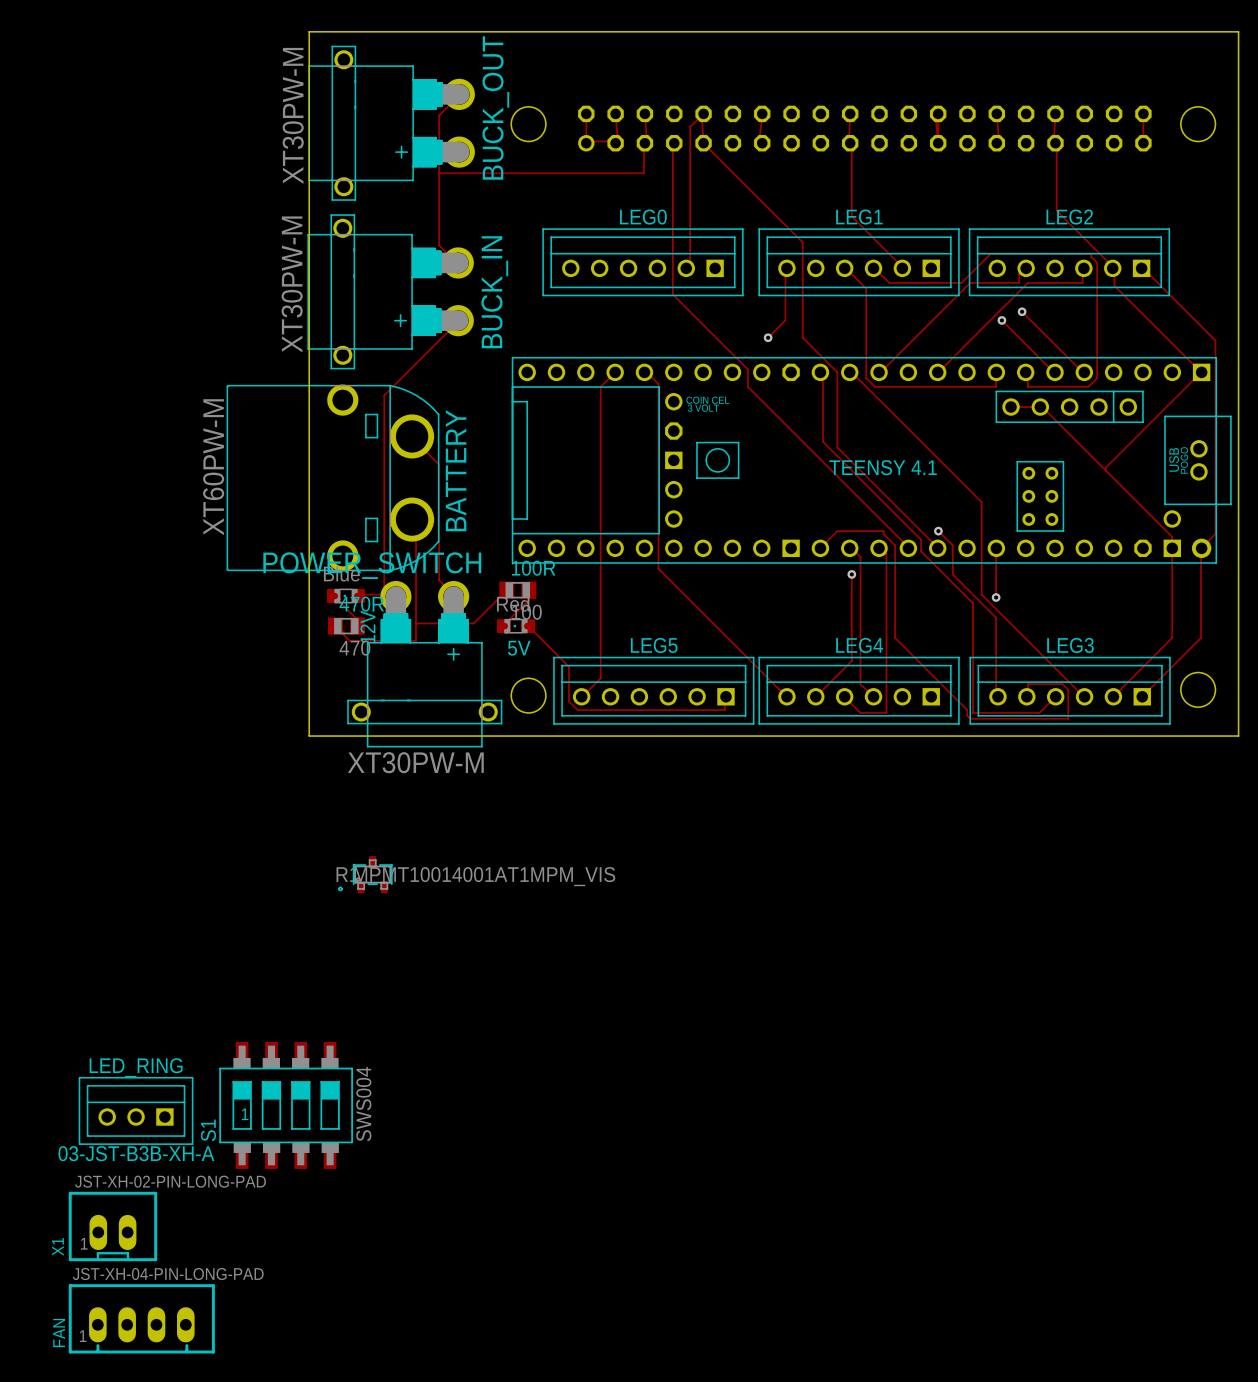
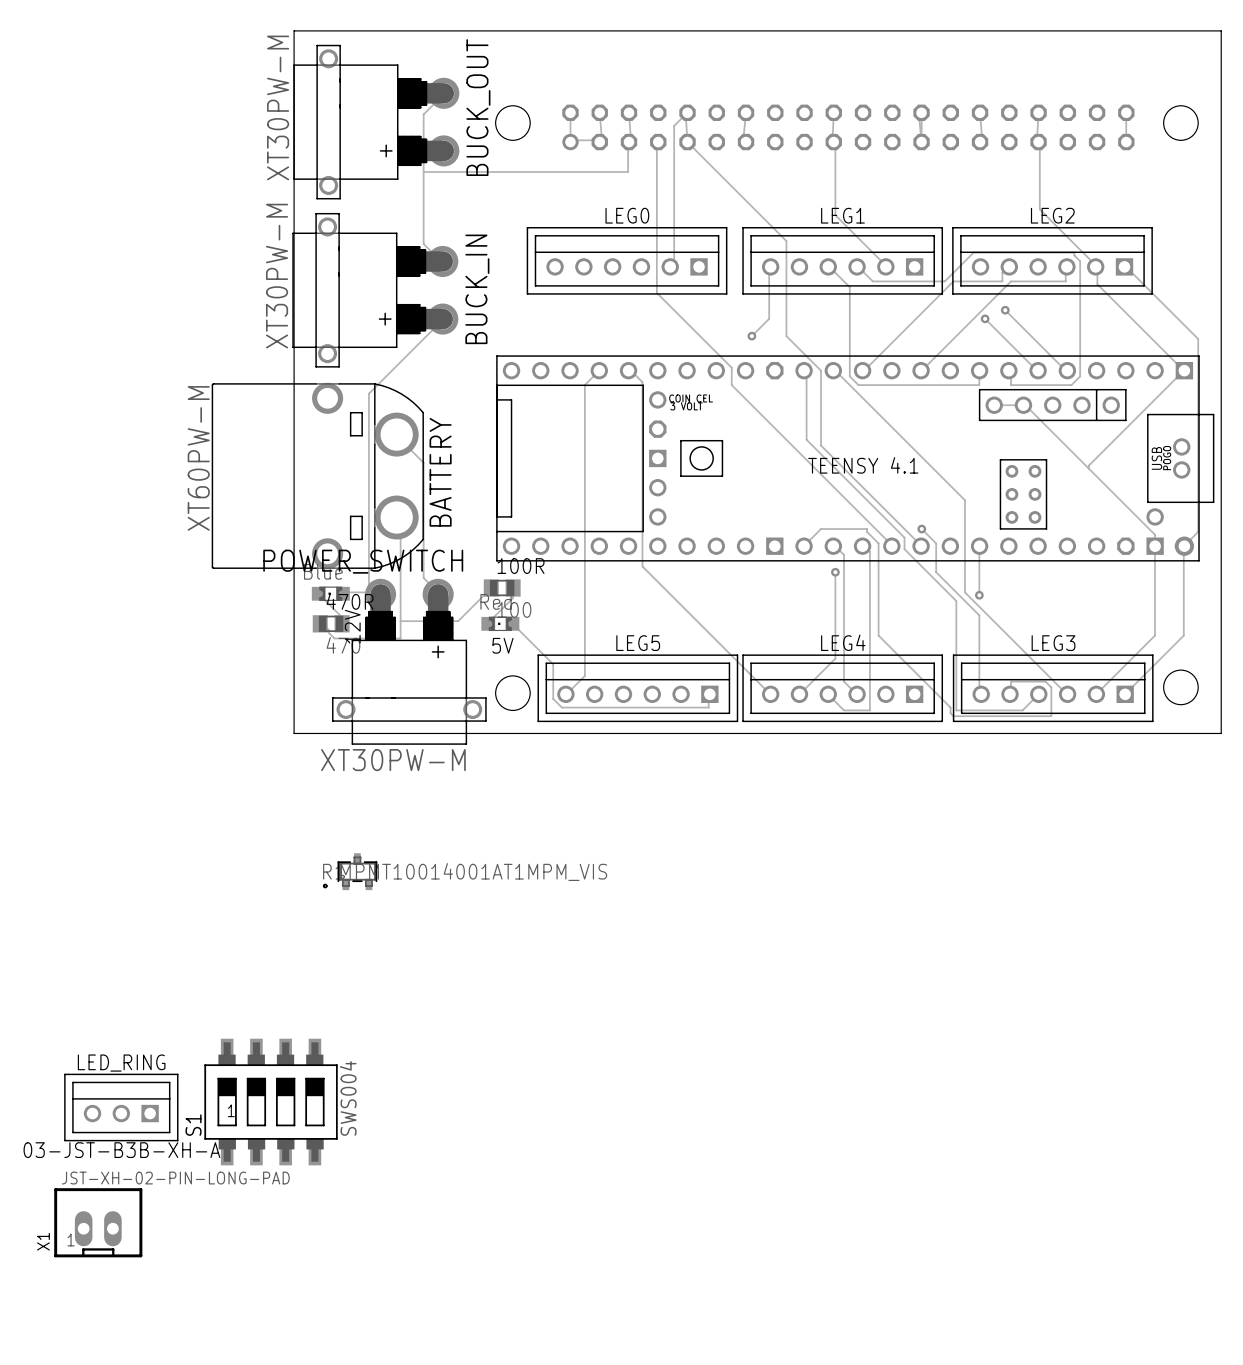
FAN: JST-XH-04-PIN-LONG-PAD (141, 1318) -> none

